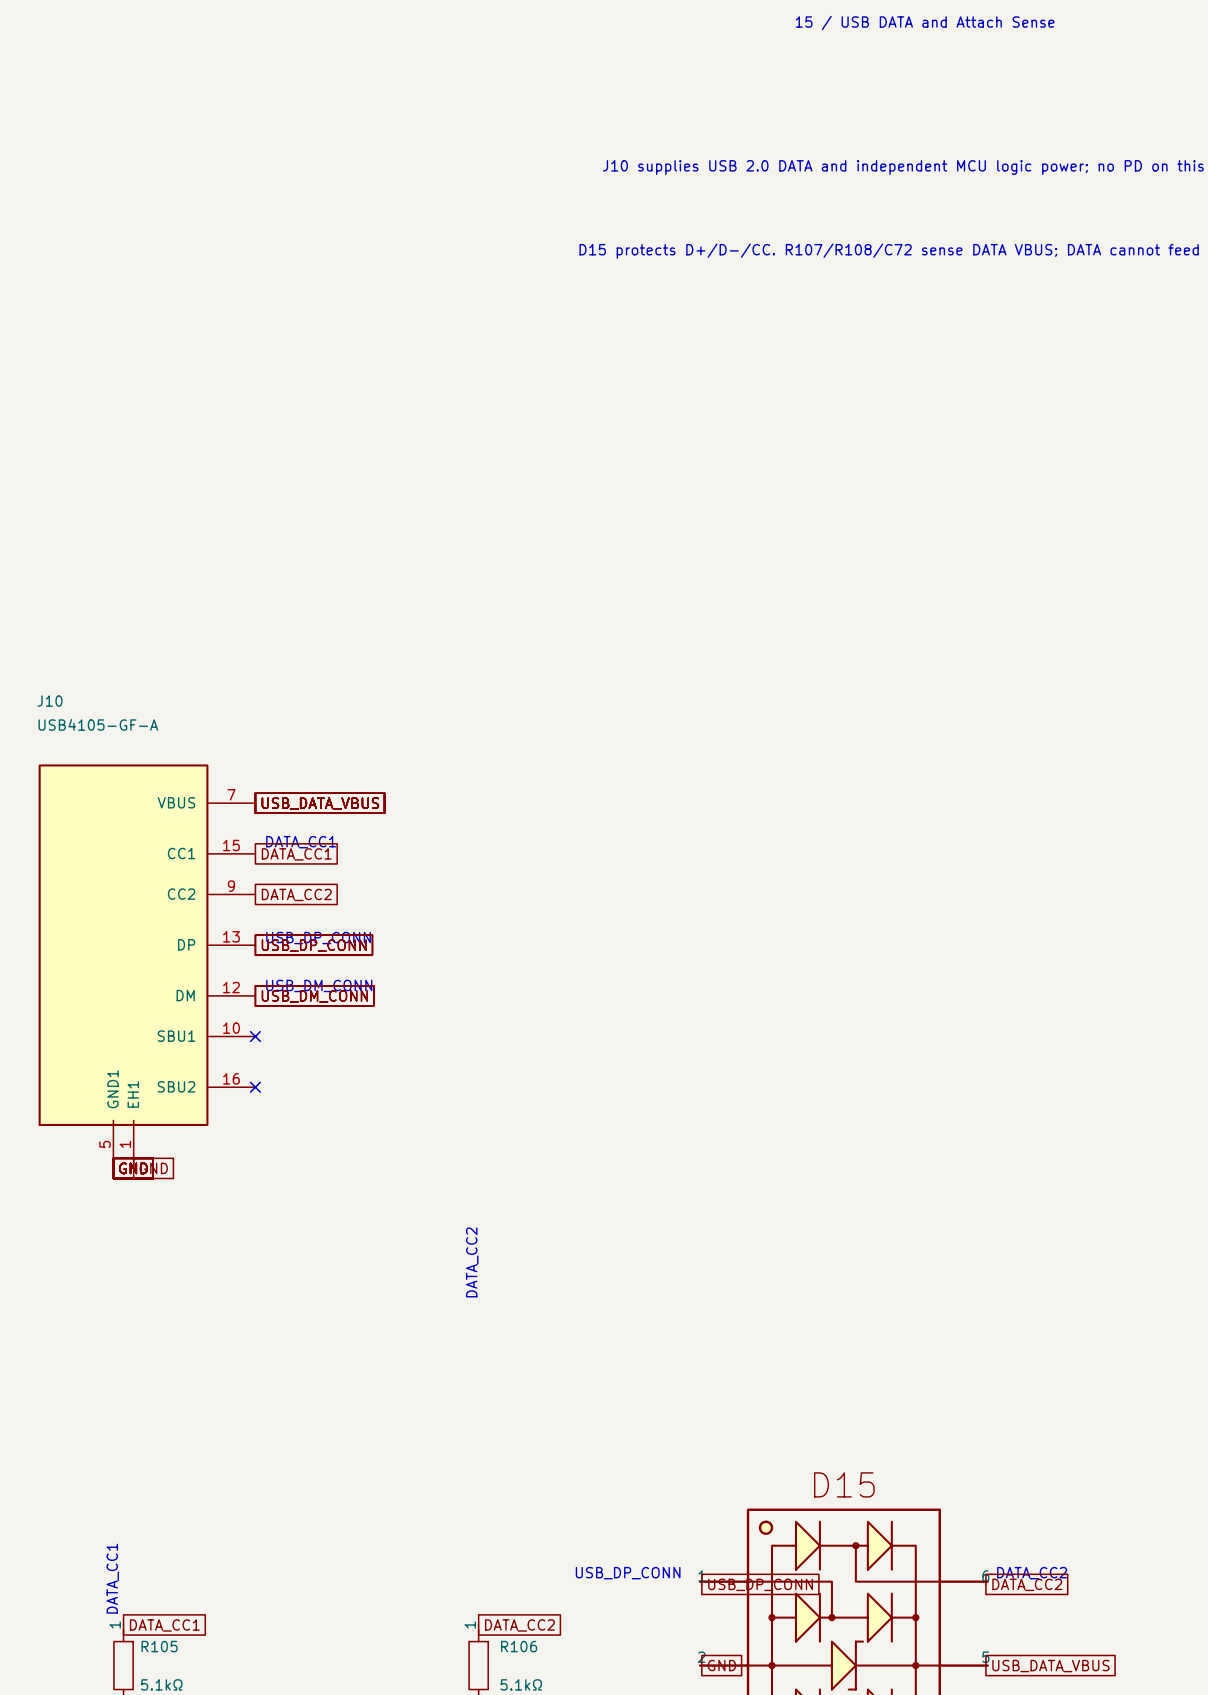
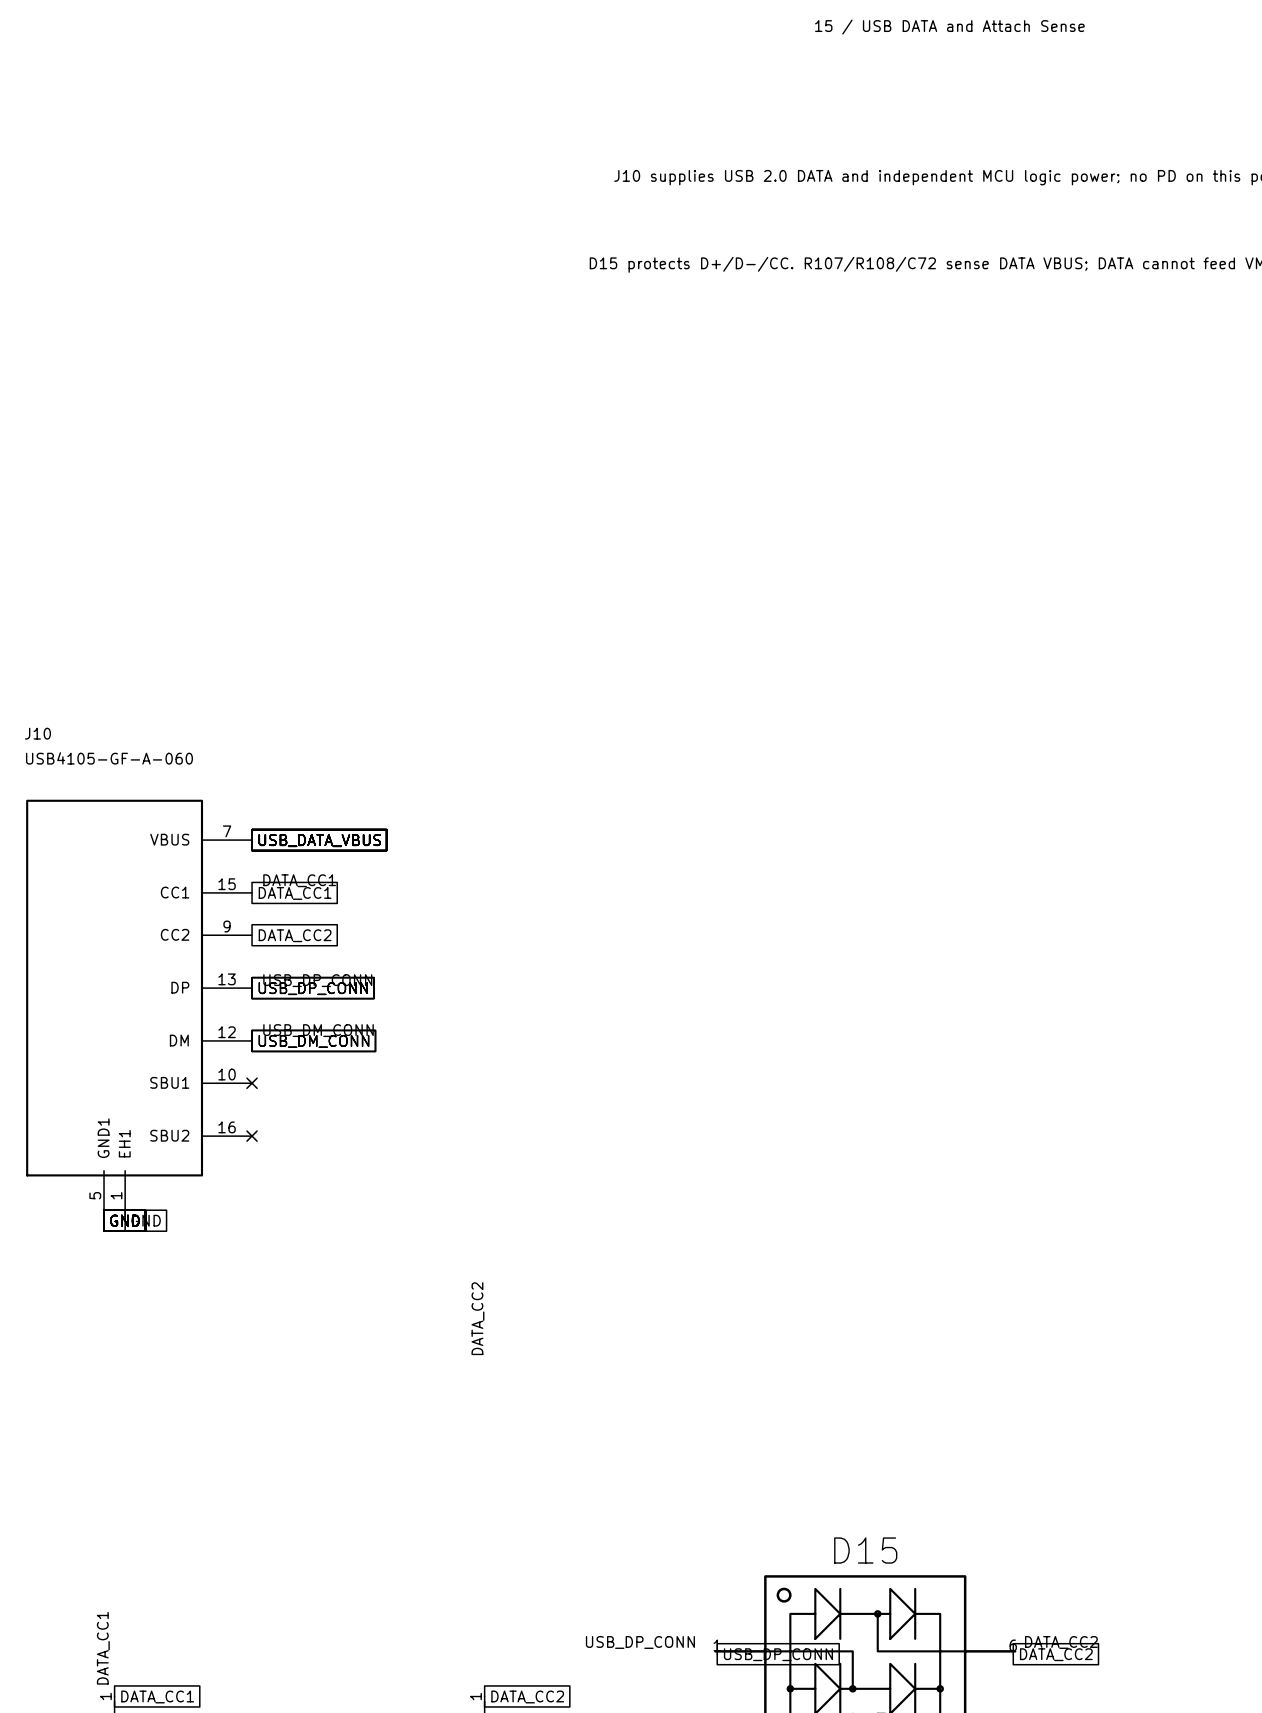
J10 value: USB4105-GF-A (98, 724) -> USB4105-GF-A-060 (109, 758)

